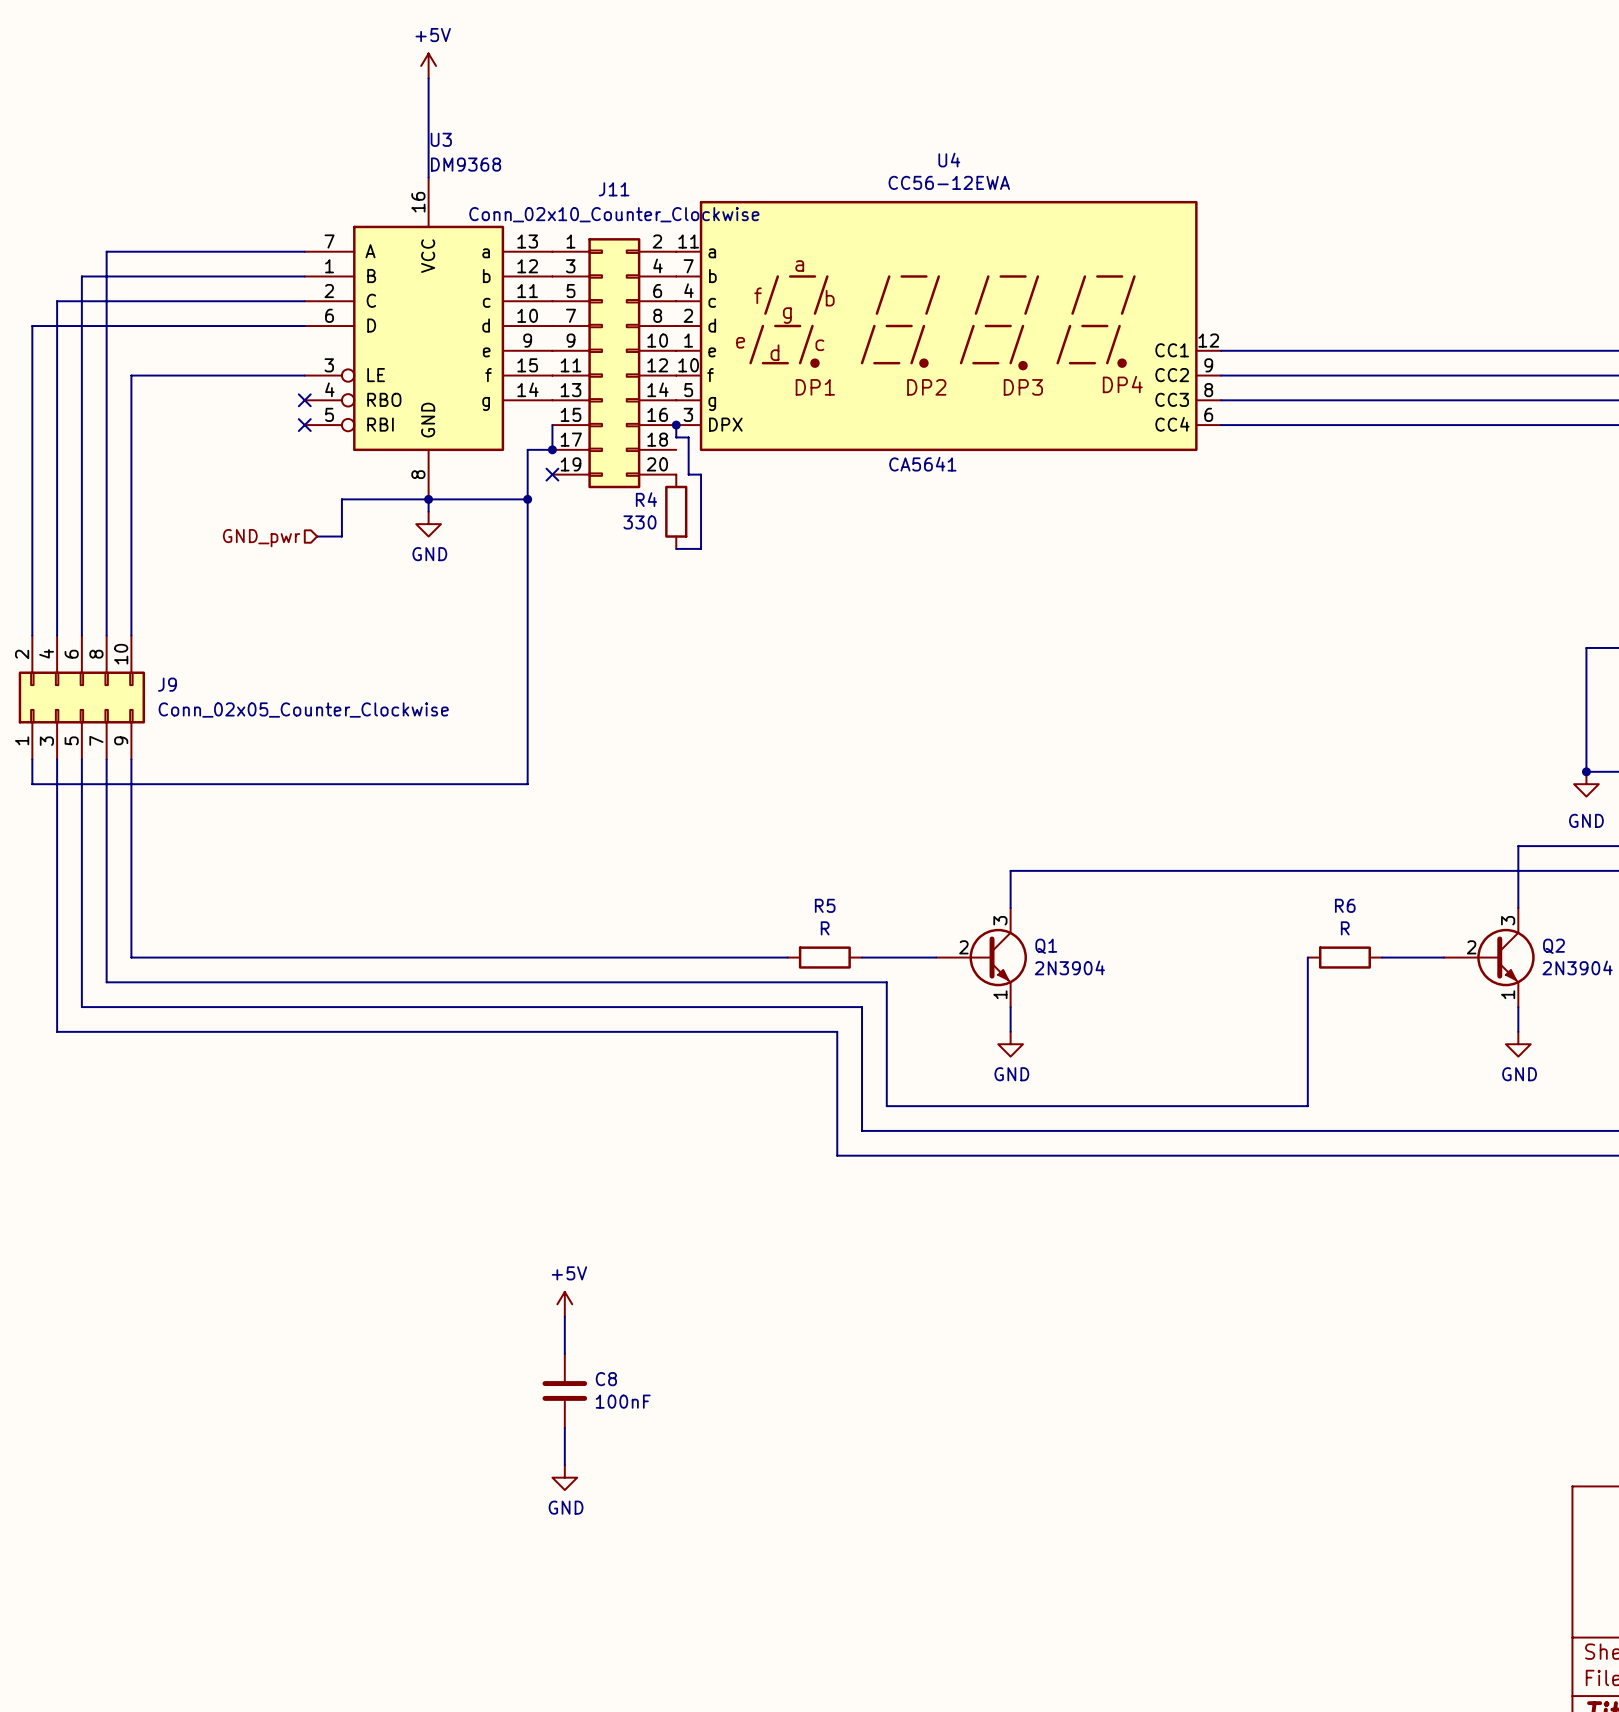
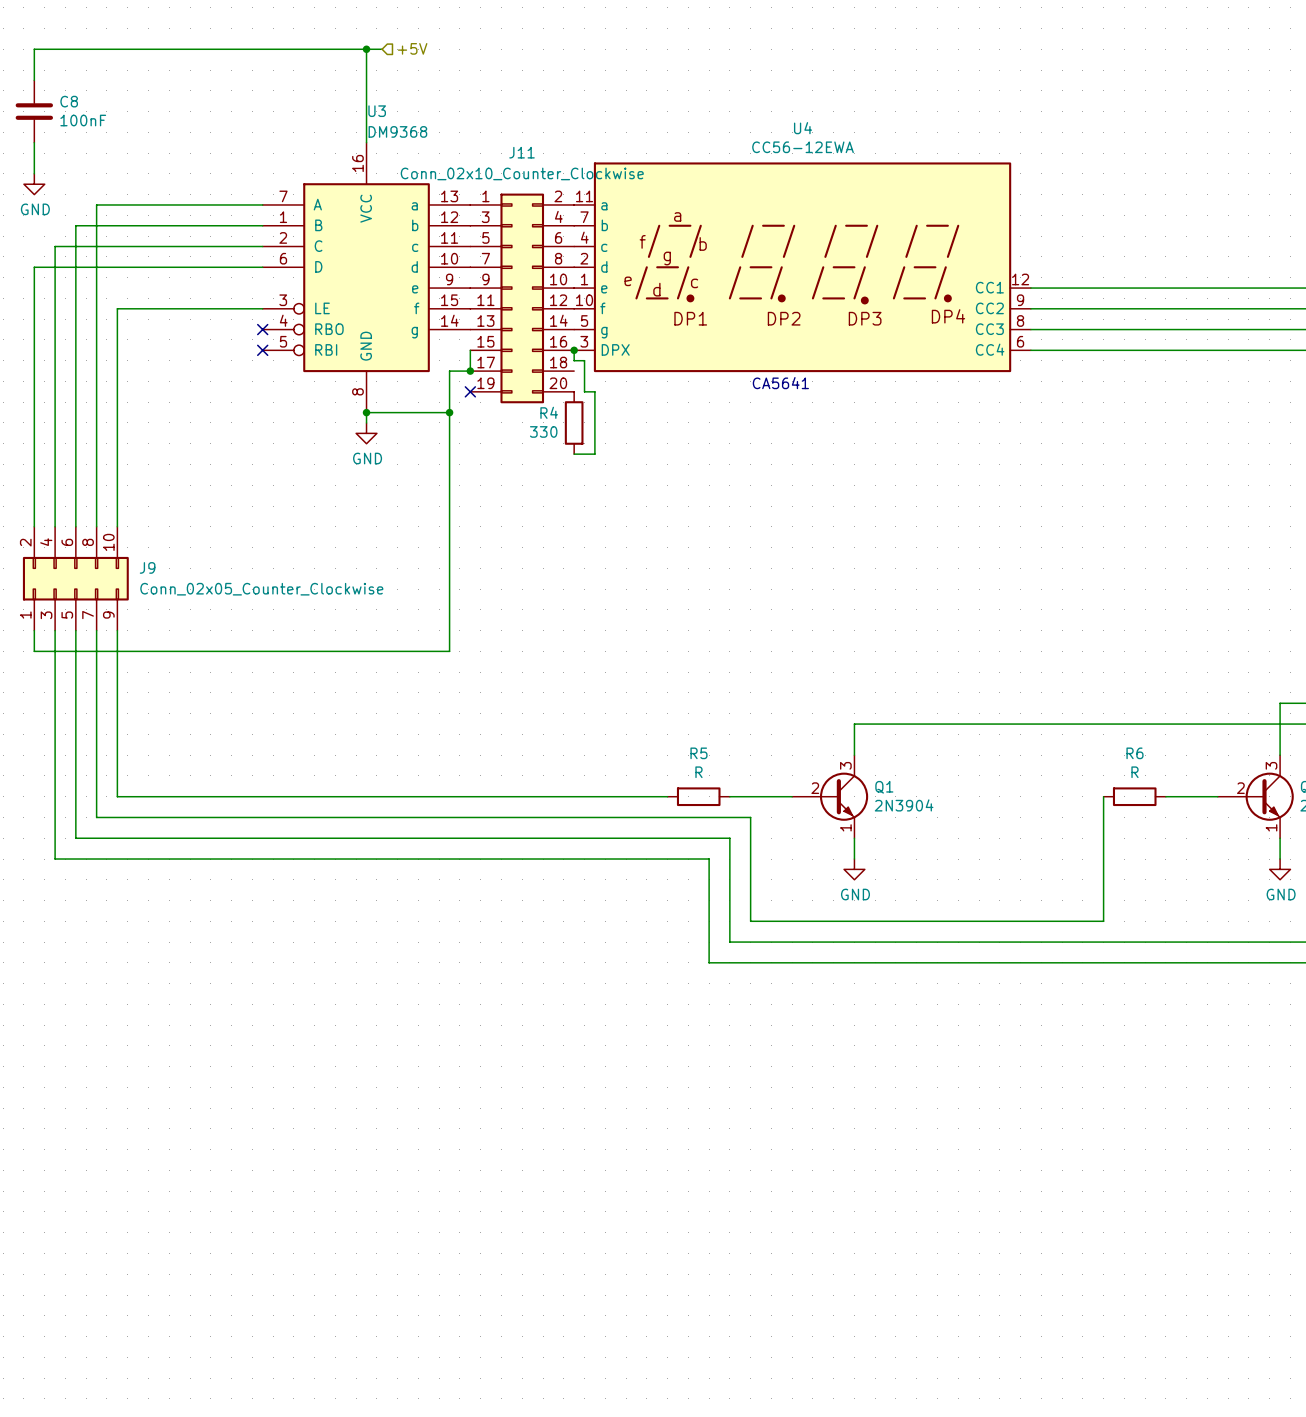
power symbol: +5V (428, 65) -> none
junction: none -> (366, 49)
wire: none -> (382, 49) (34, 49) (34, 80)
hierarchical label: none -> +5V (412, 48)
wire: none -> (34, 142) (34, 173)
power symbol: none -> GND (34, 184)
wire: (428, 499) (341, 499) (341, 536) (317, 536) -> none
hierarchical label: GND_pwr (261, 538) -> none
power symbol: +5V (564, 1304) -> none
wire: (564, 1316) (564, 1353) -> none
C8 position: (564, 1390) -> (34, 111)
wire: (564, 1428) (564, 1465) -> none
power symbol: GND (564, 1477) -> none

